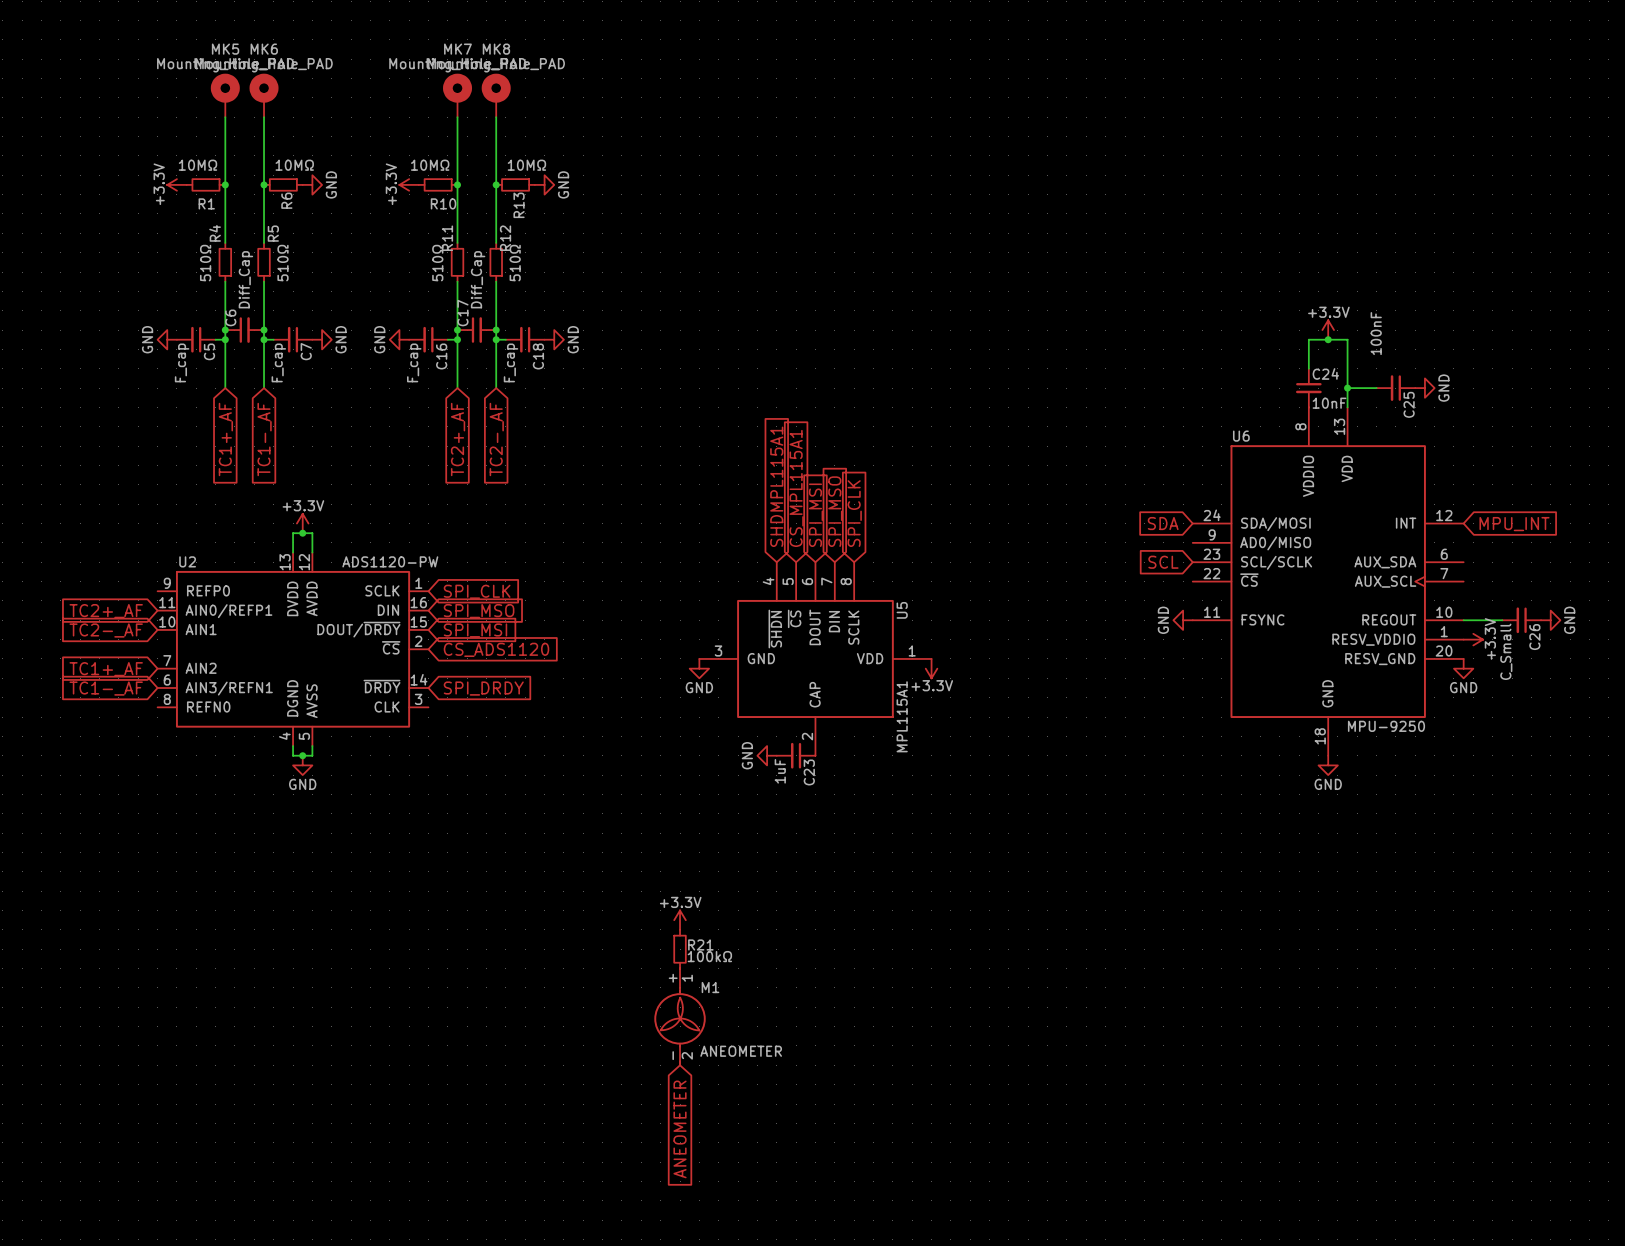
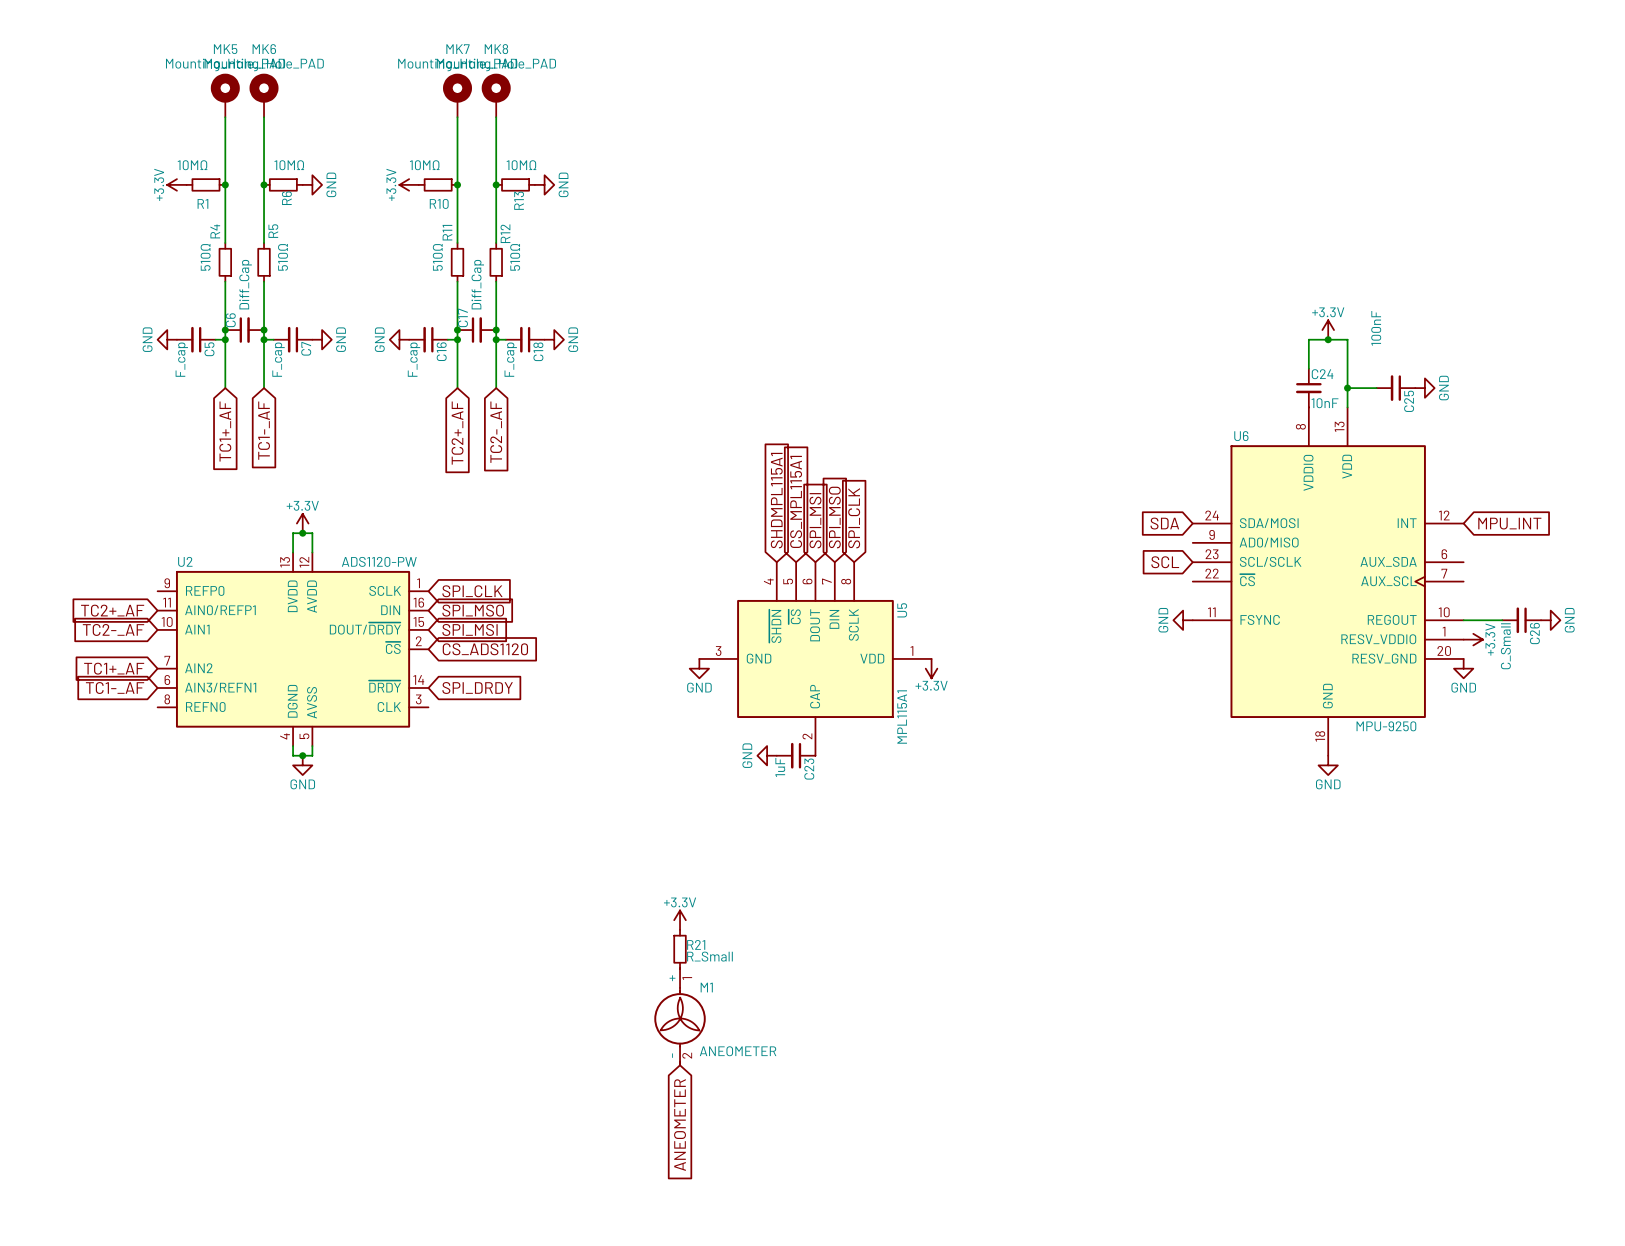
R21 value: 100kΩ (709, 956) -> R_Small (709, 956)

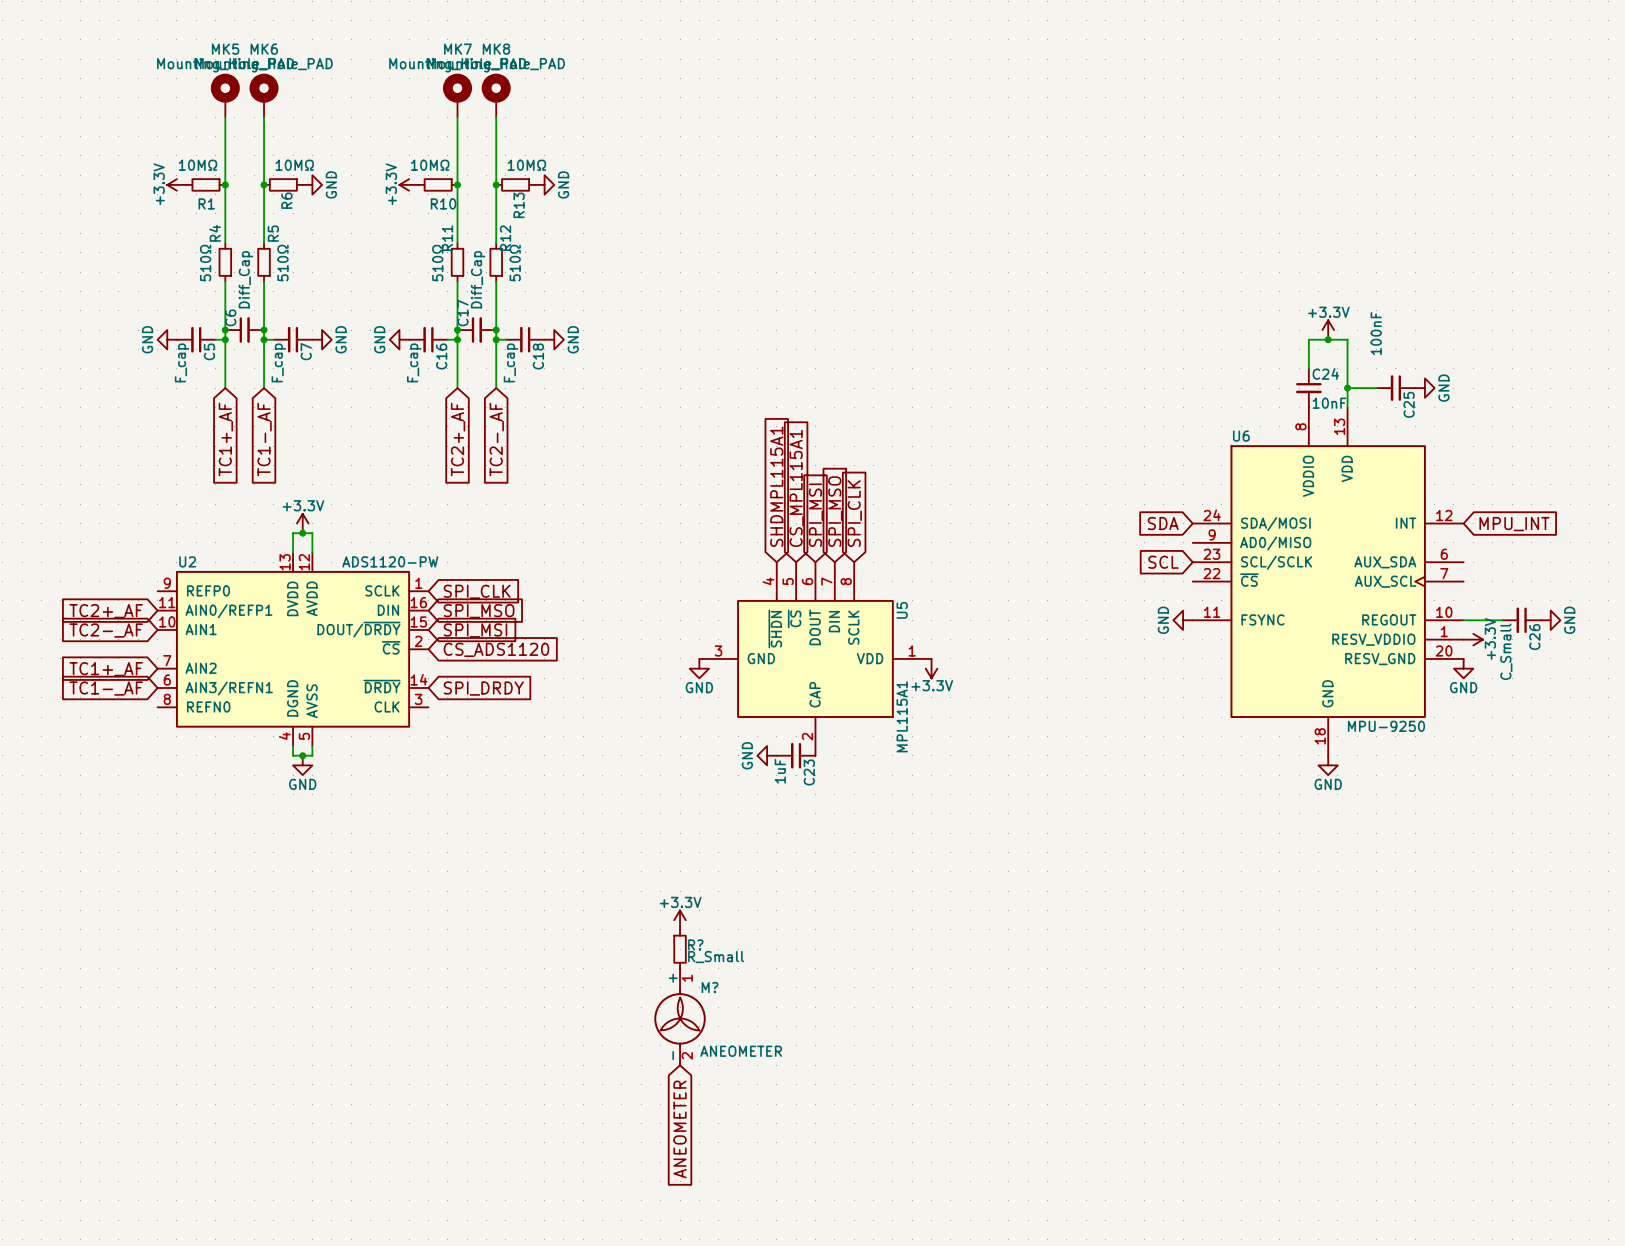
R21 name: R21 (696, 944) -> R? (695, 944)
M1 name: M1 (706, 987) -> M? (710, 987)

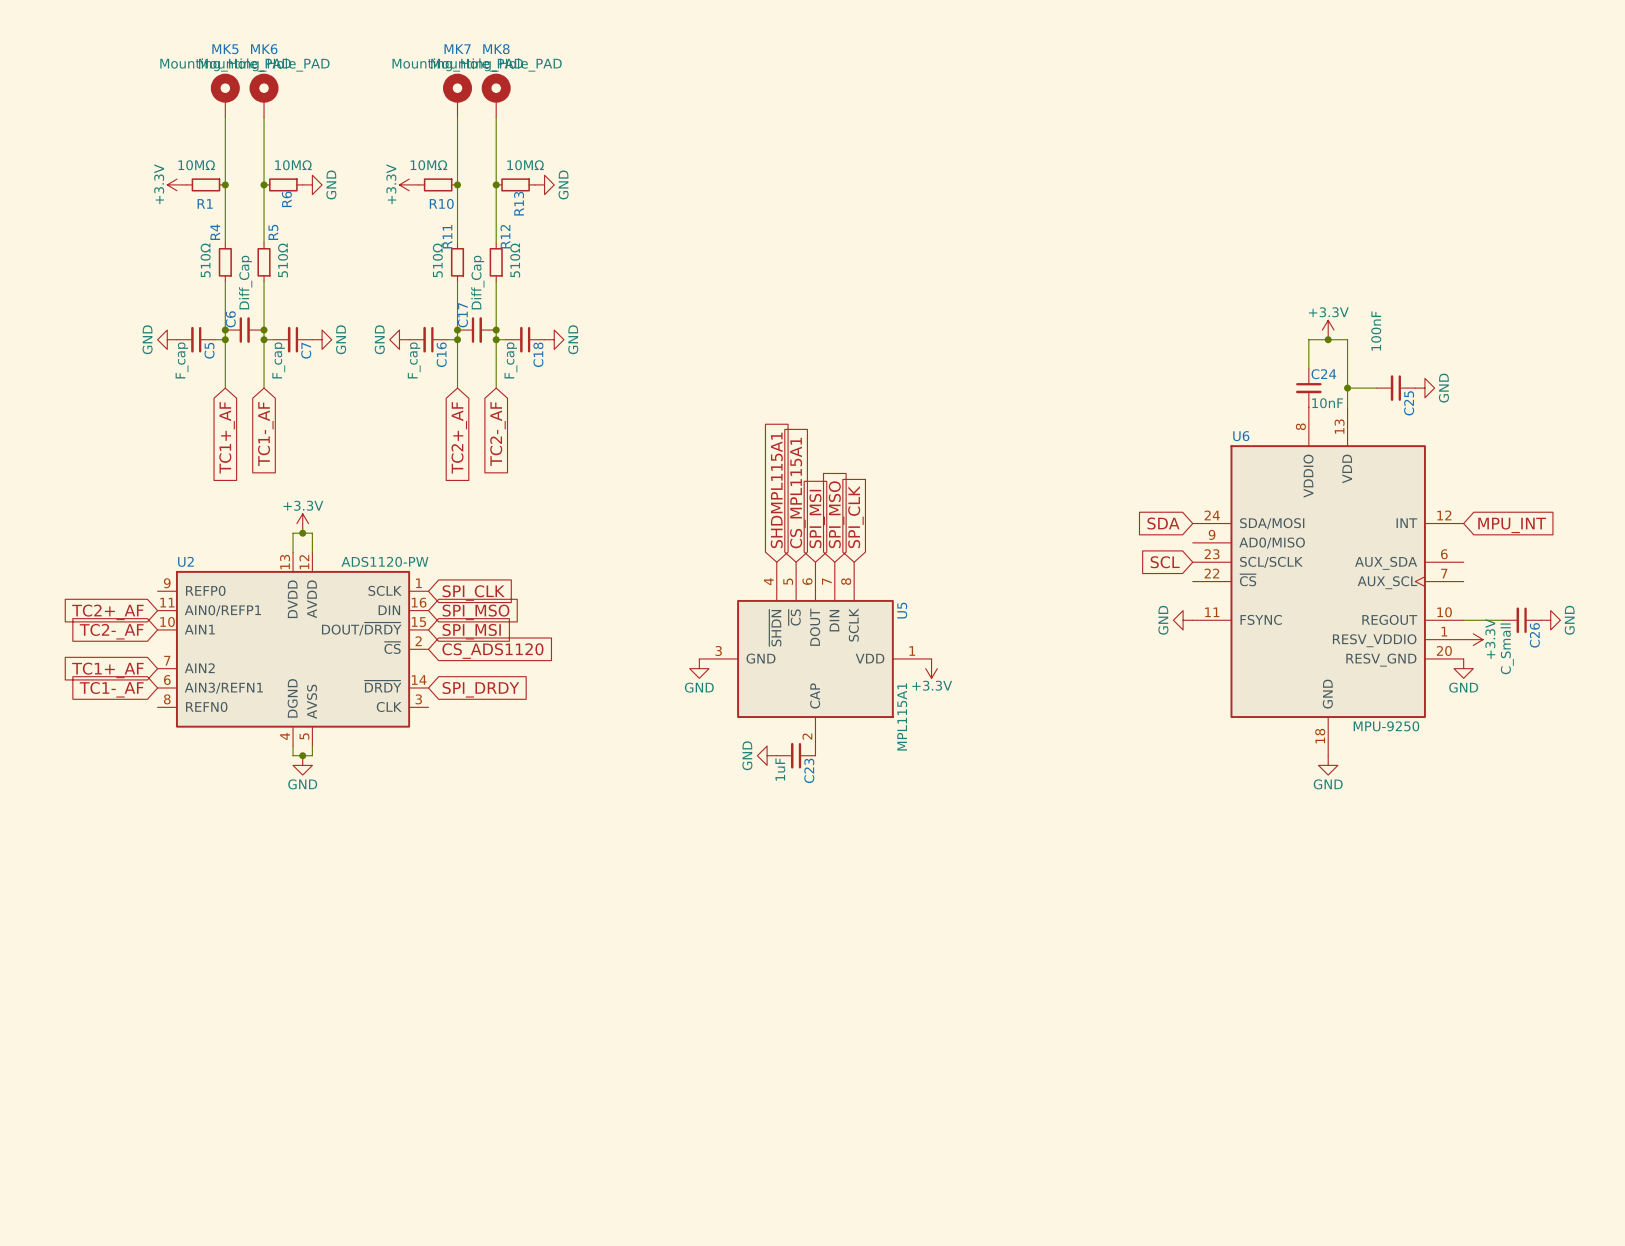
power symbol: +3.3V (680, 920) -> none
R?: R_Small (680, 949) -> none
M?: ANEOMETER (680, 1016) -> none
global label: ANEOMETER (680, 1129) -> none

